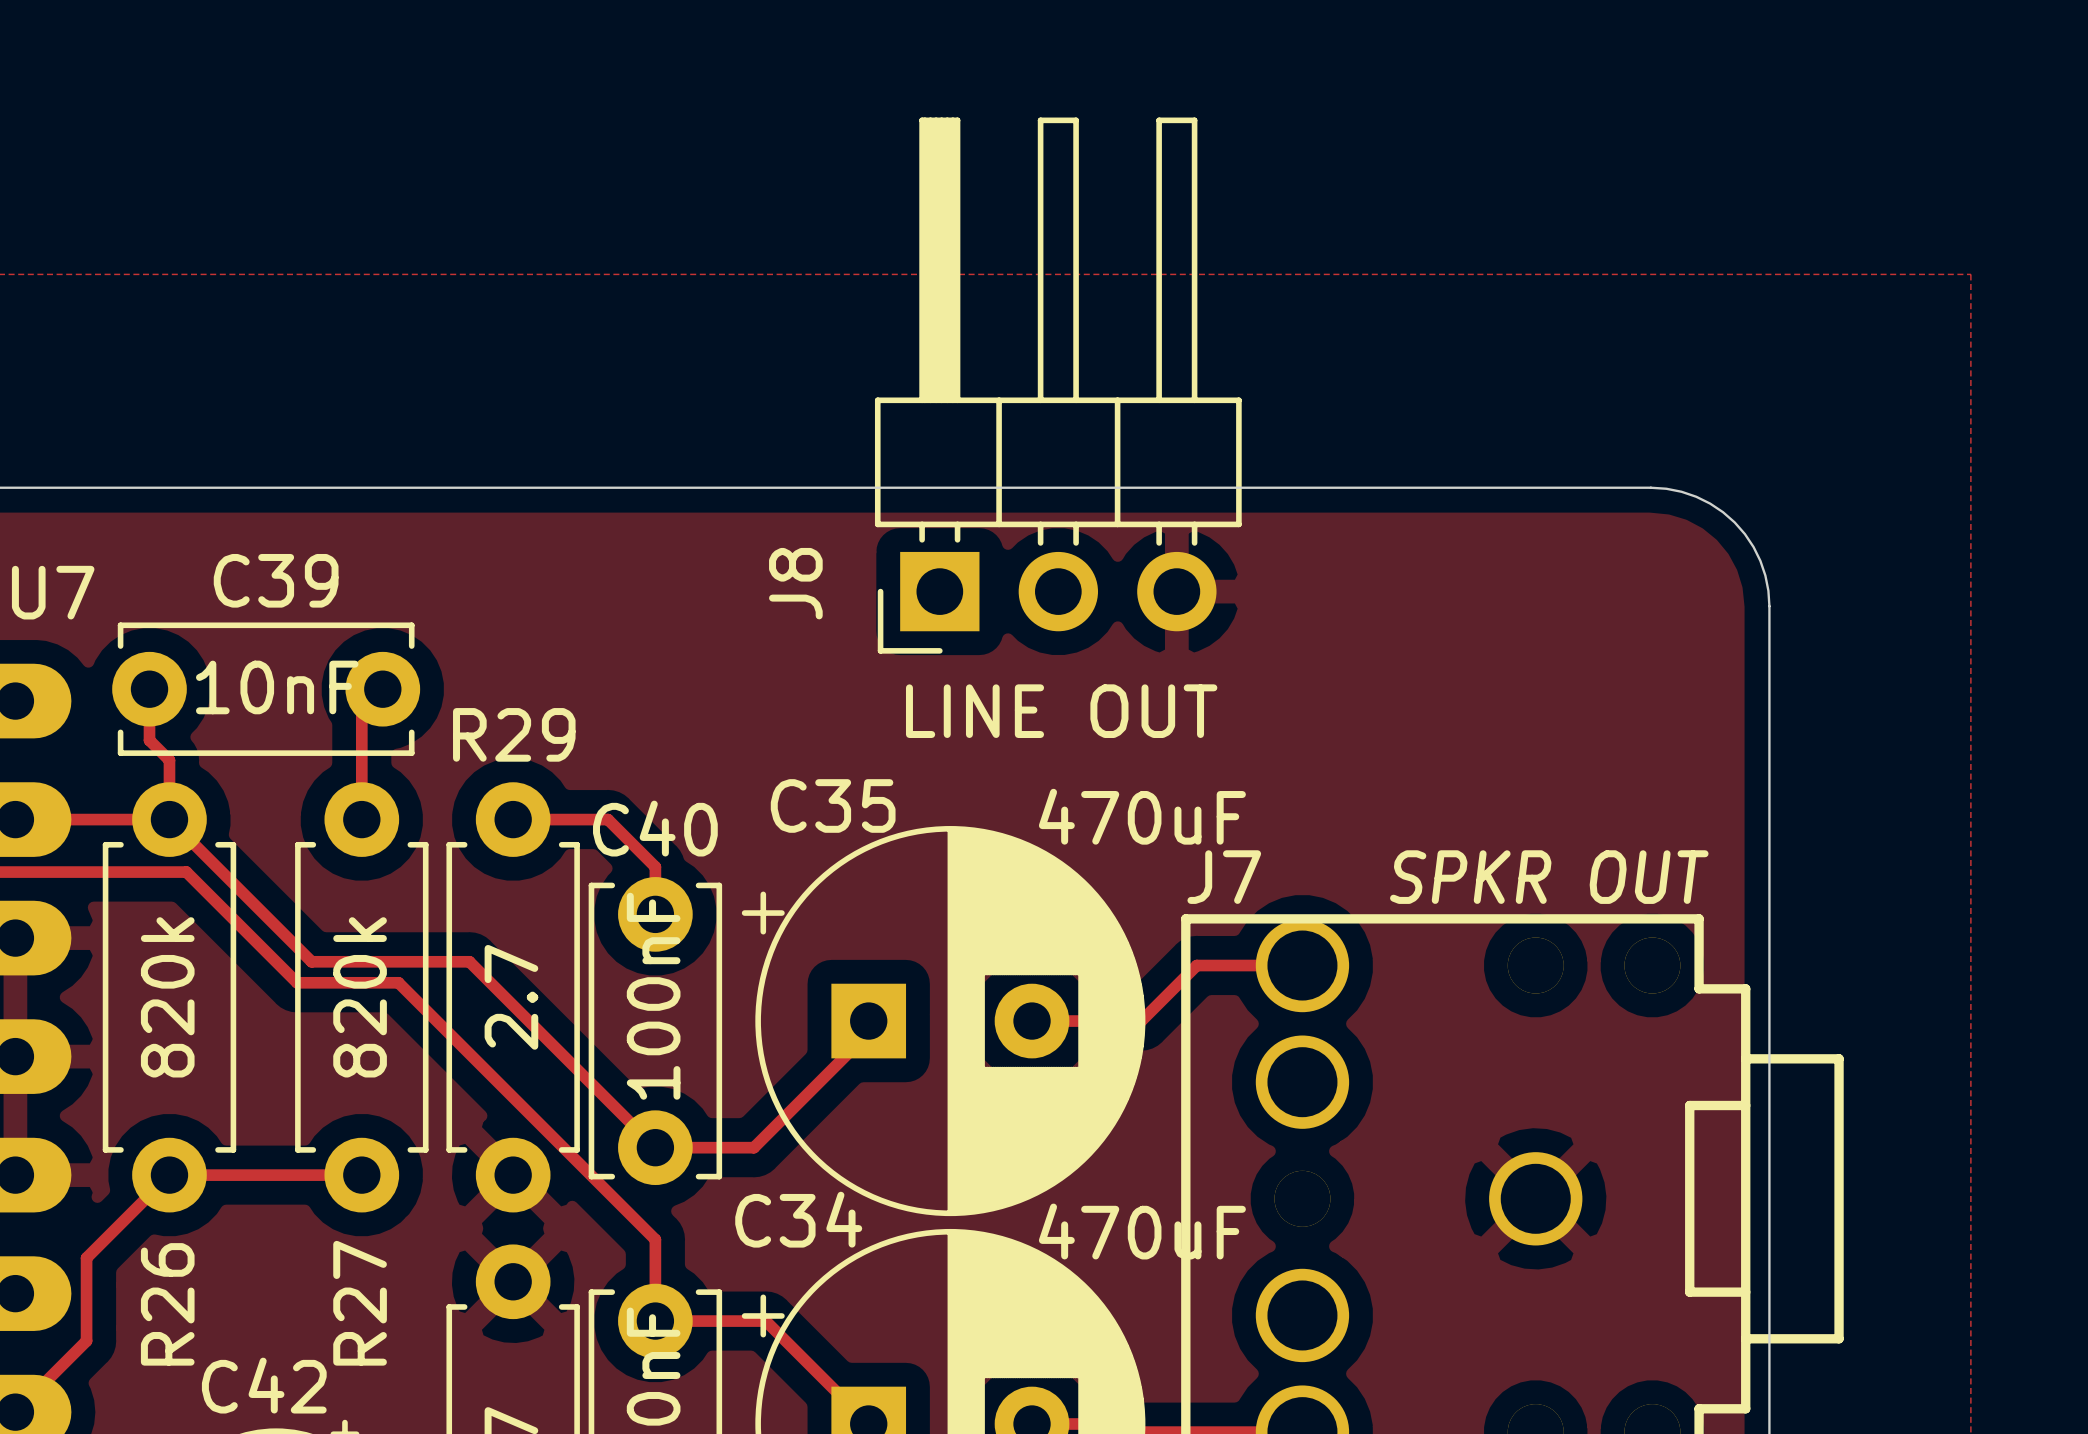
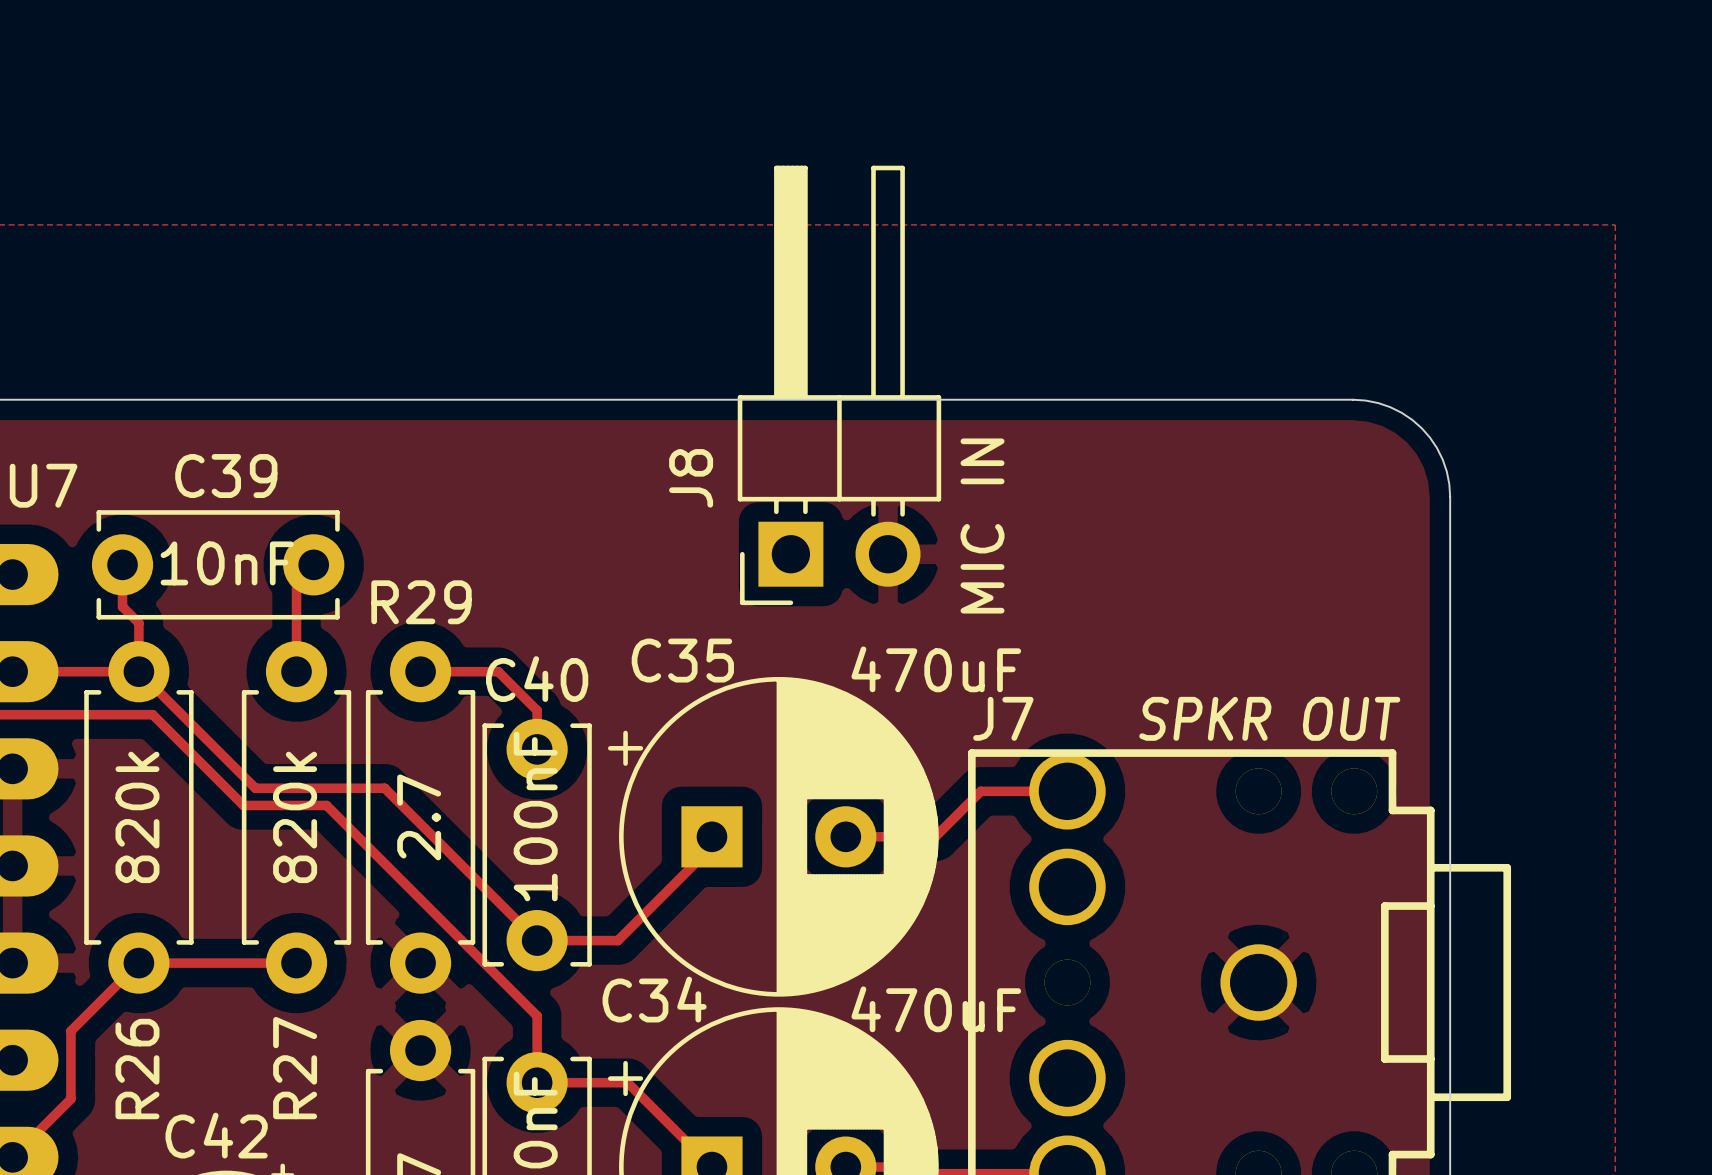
J8 footprint: [874, 117, 1242, 654] -> [737, 165, 942, 606]
J8 name position: J8 (795, 583) -> J8 (691, 478)
J8 value: LINE OUT (1061, 711) -> MIC IN (982, 526)

